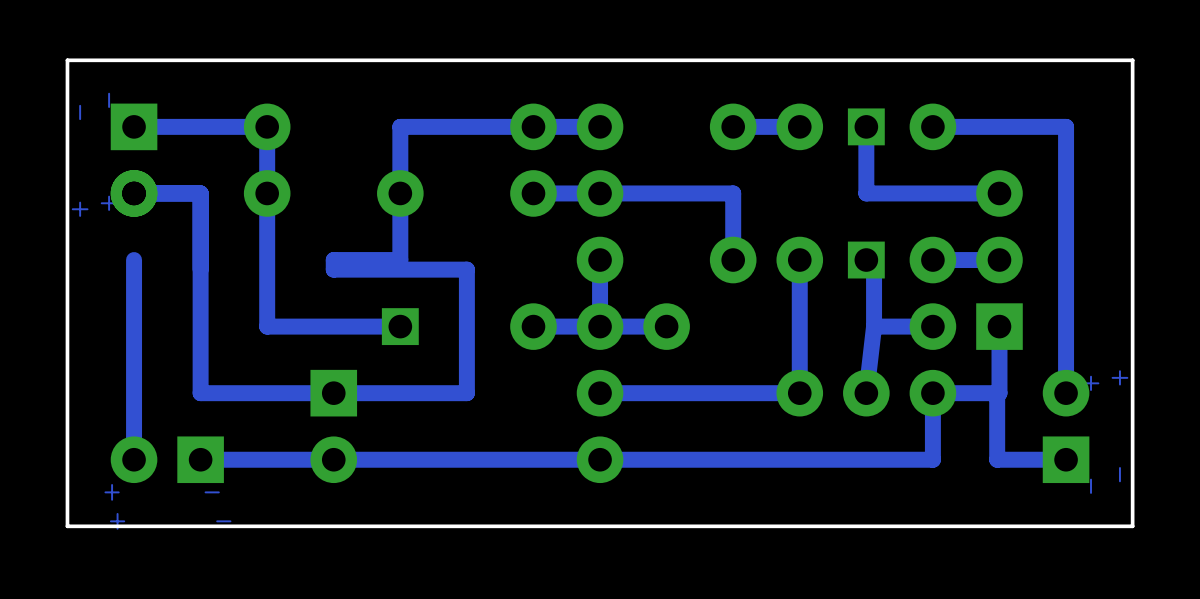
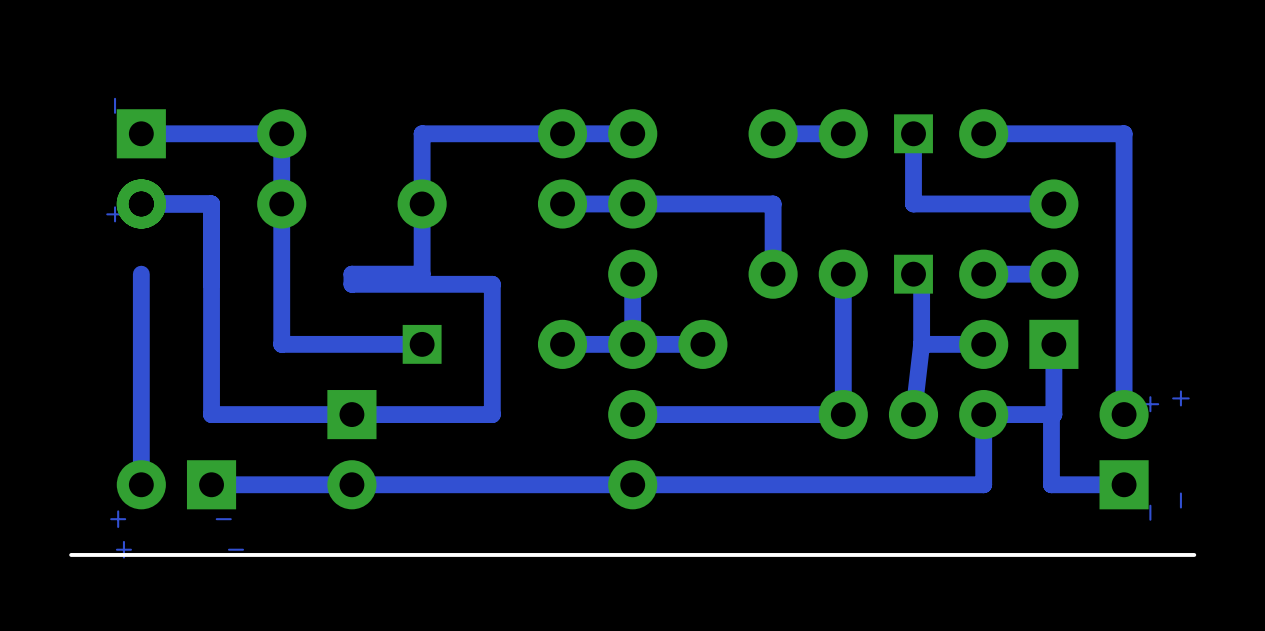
text: - (80, 112) -> none
text: + (80, 209) -> none
board edge: (1132, 526) (1132, 60) (67, 60) (67, 526) -> none

